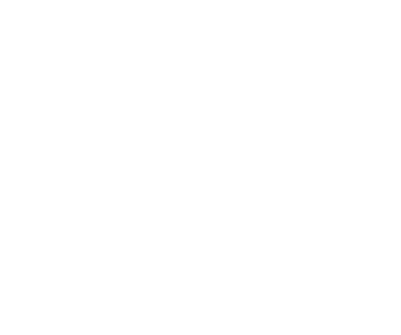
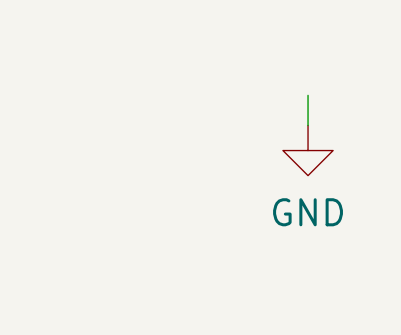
wire: none -> (308, 95) (308, 125)
power symbol: none -> GND (308, 150)

